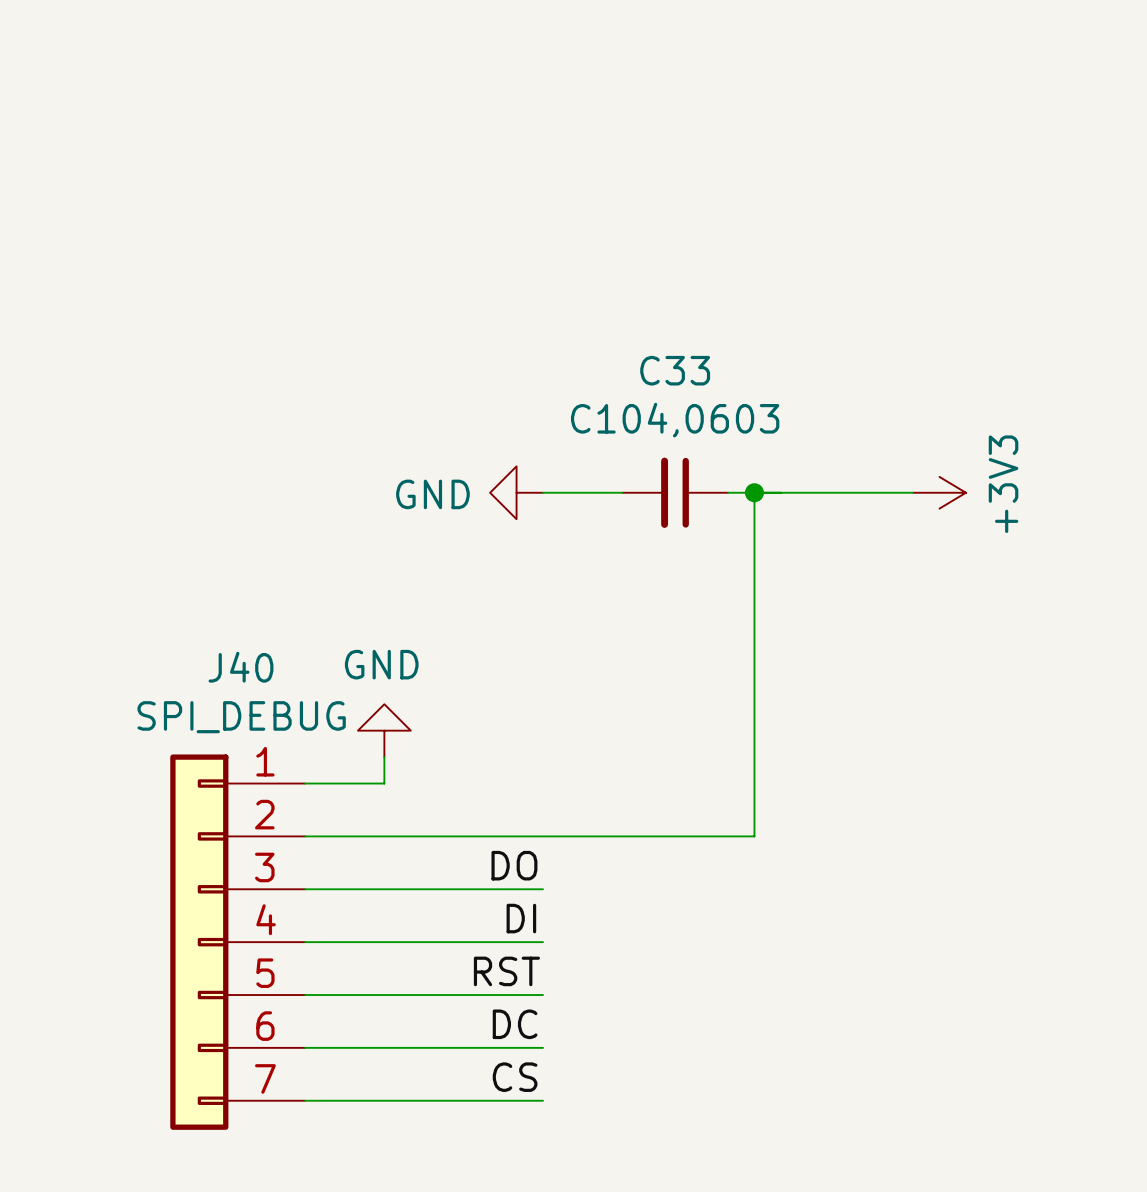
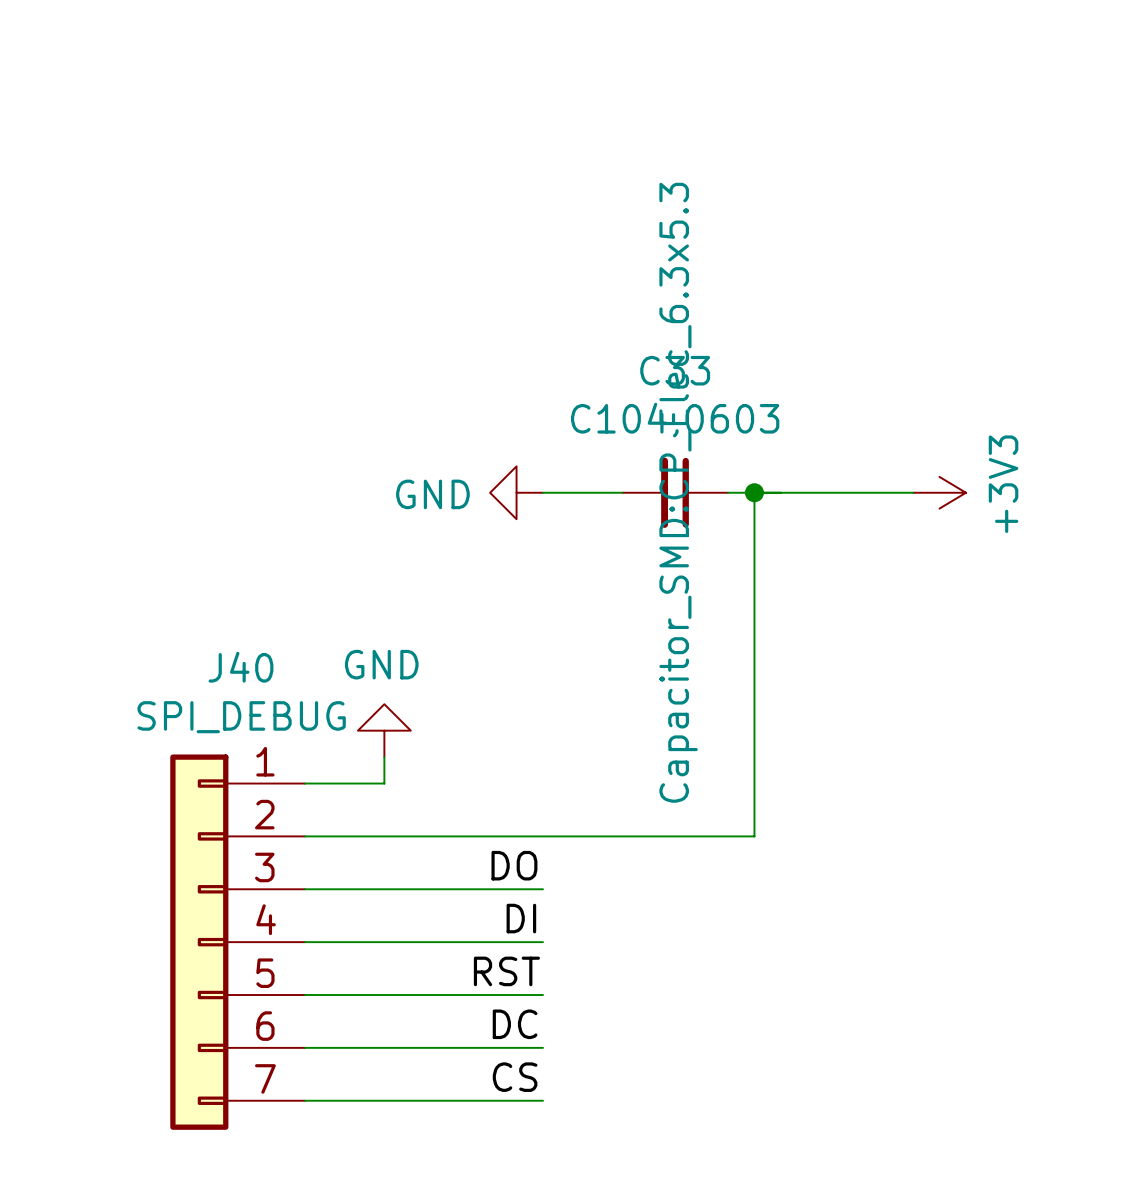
C33 text: none -> Capacitor_SMD:CP_Elec_6.3x5.3 (678, 492)

